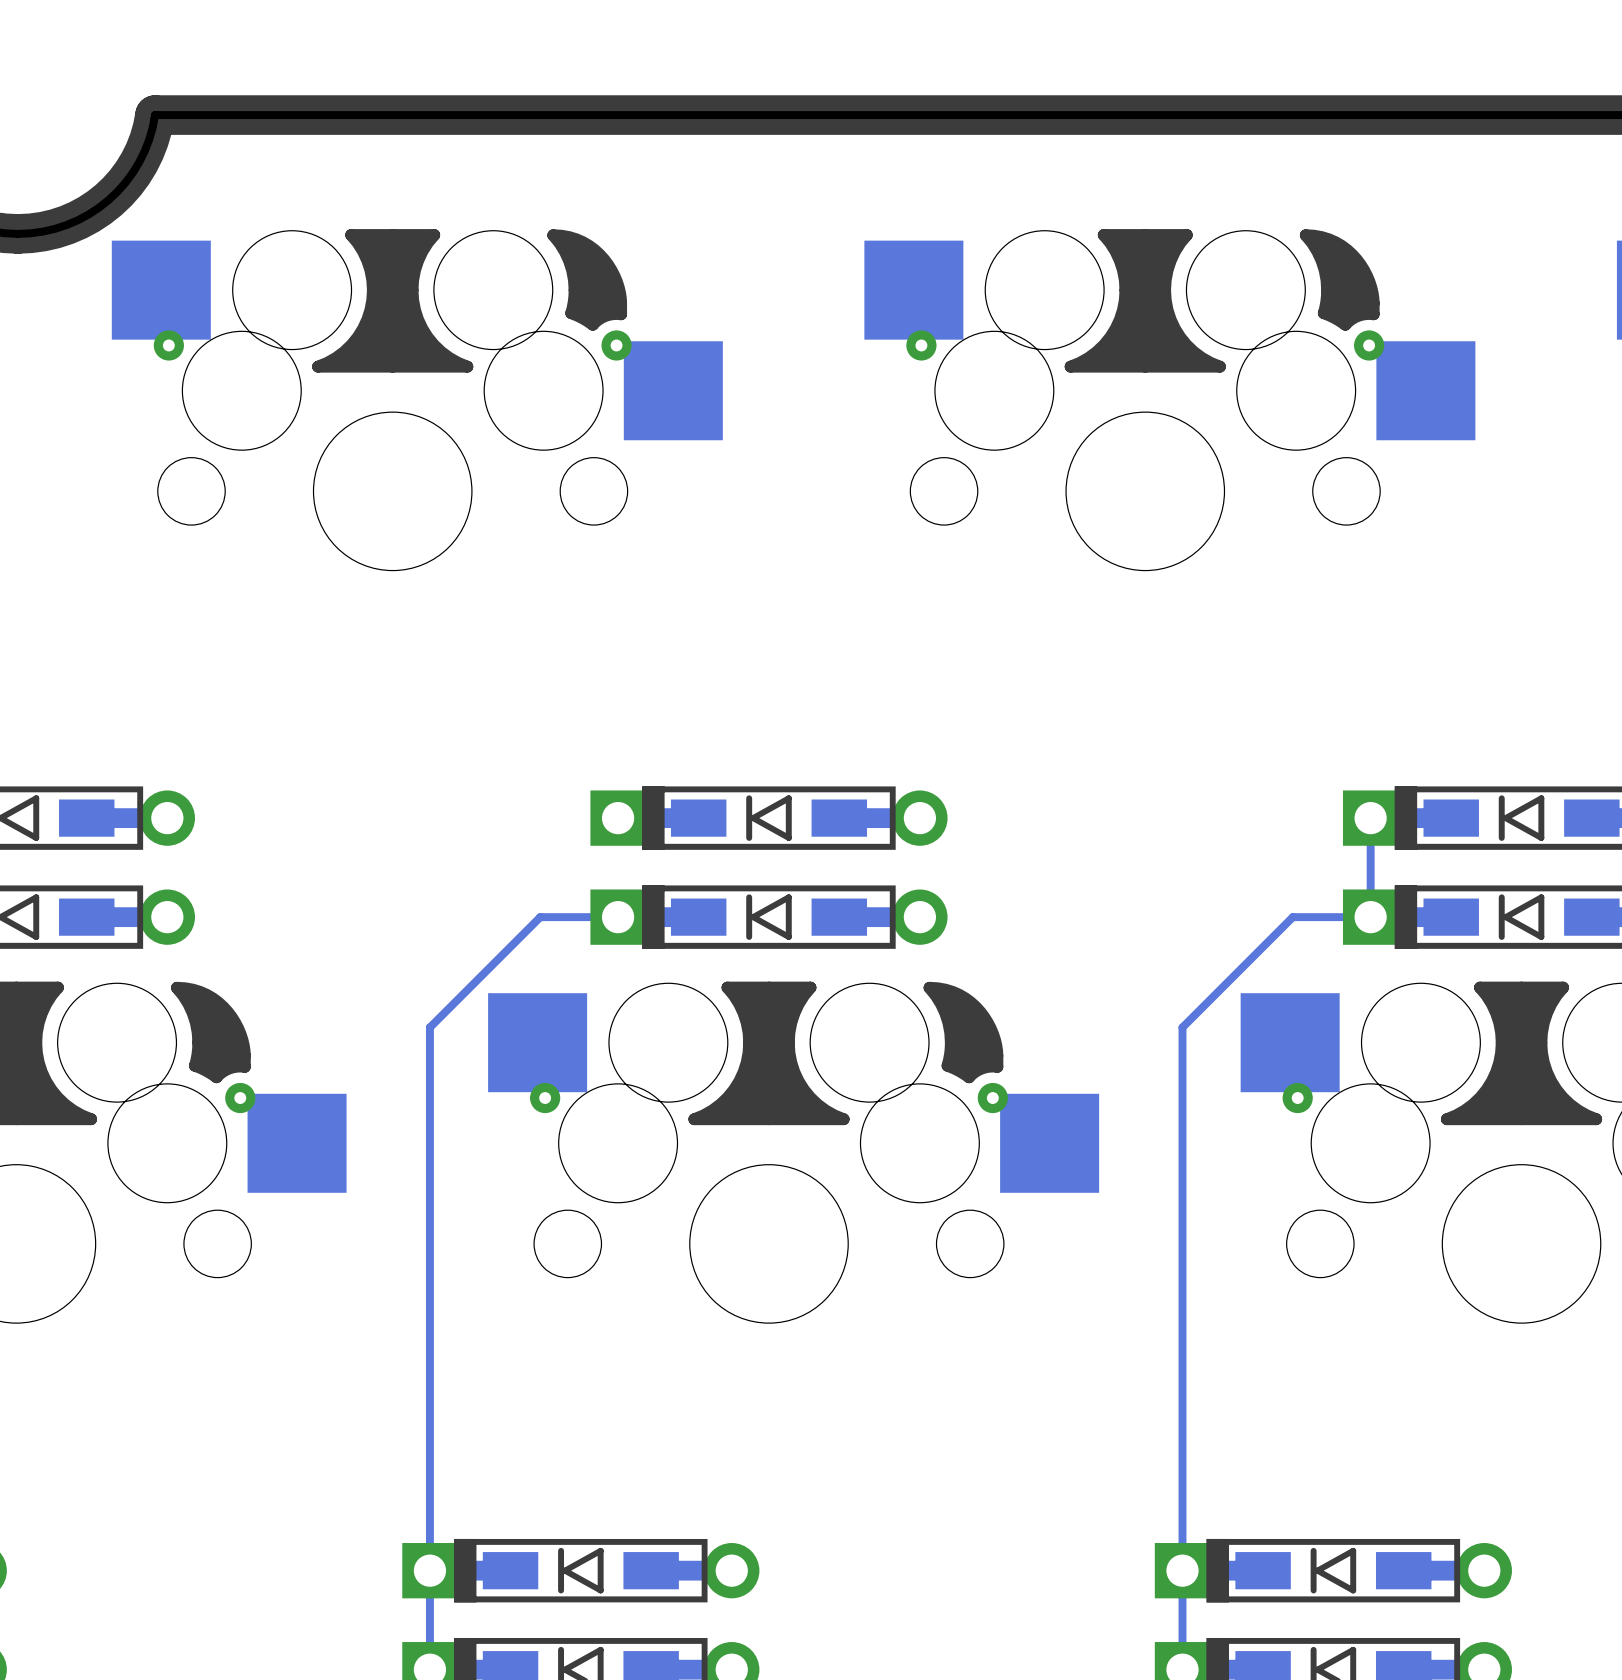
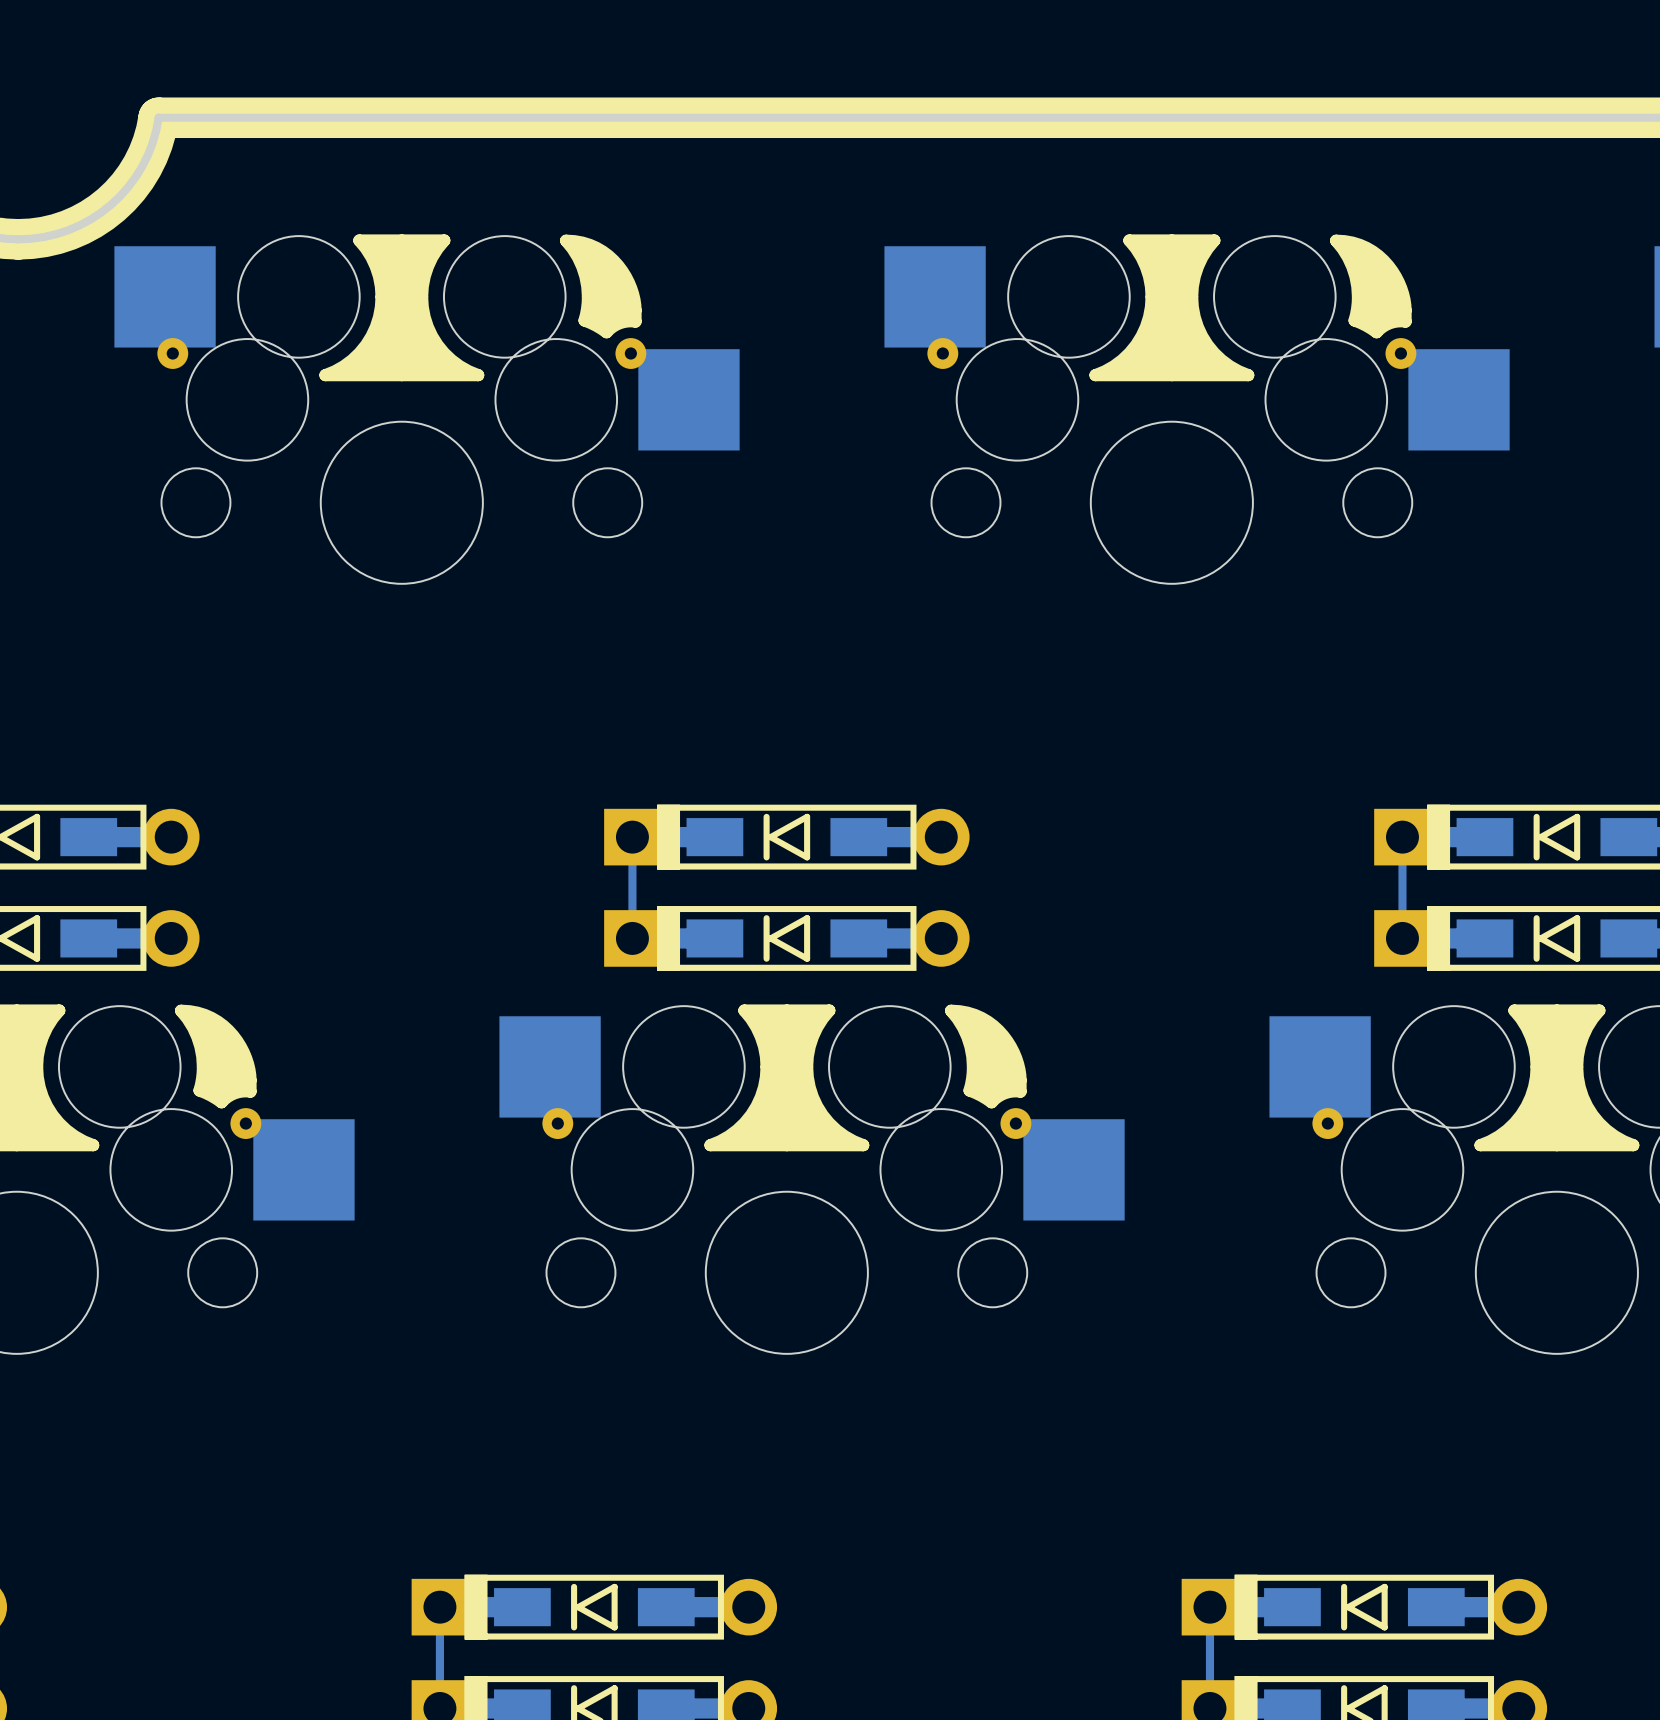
track: (618, 917) (540, 917) (429, 1027) (429, 1570) -> (632, 938) (632, 837)
track: (1370, 917) (1292, 917) (1182, 1027) (1182, 1570) -> none

